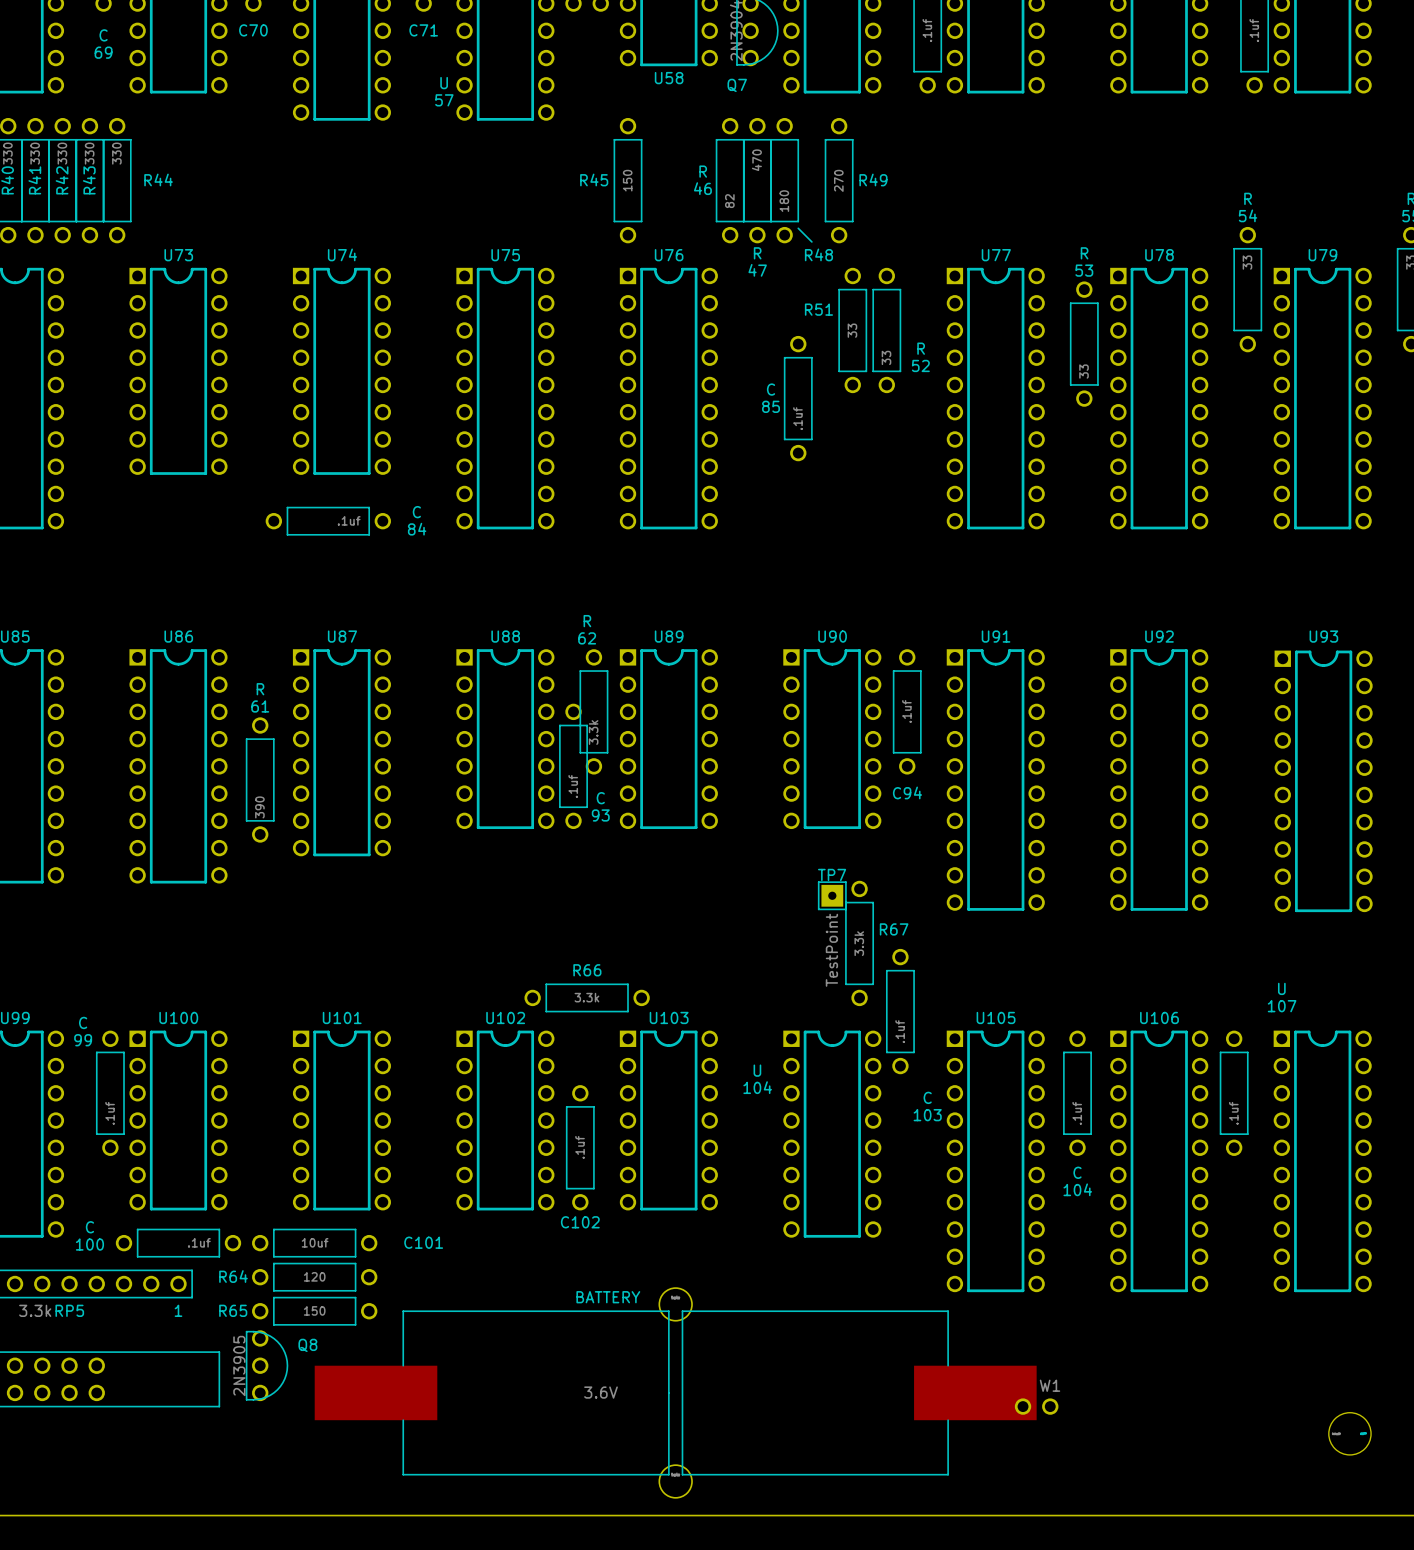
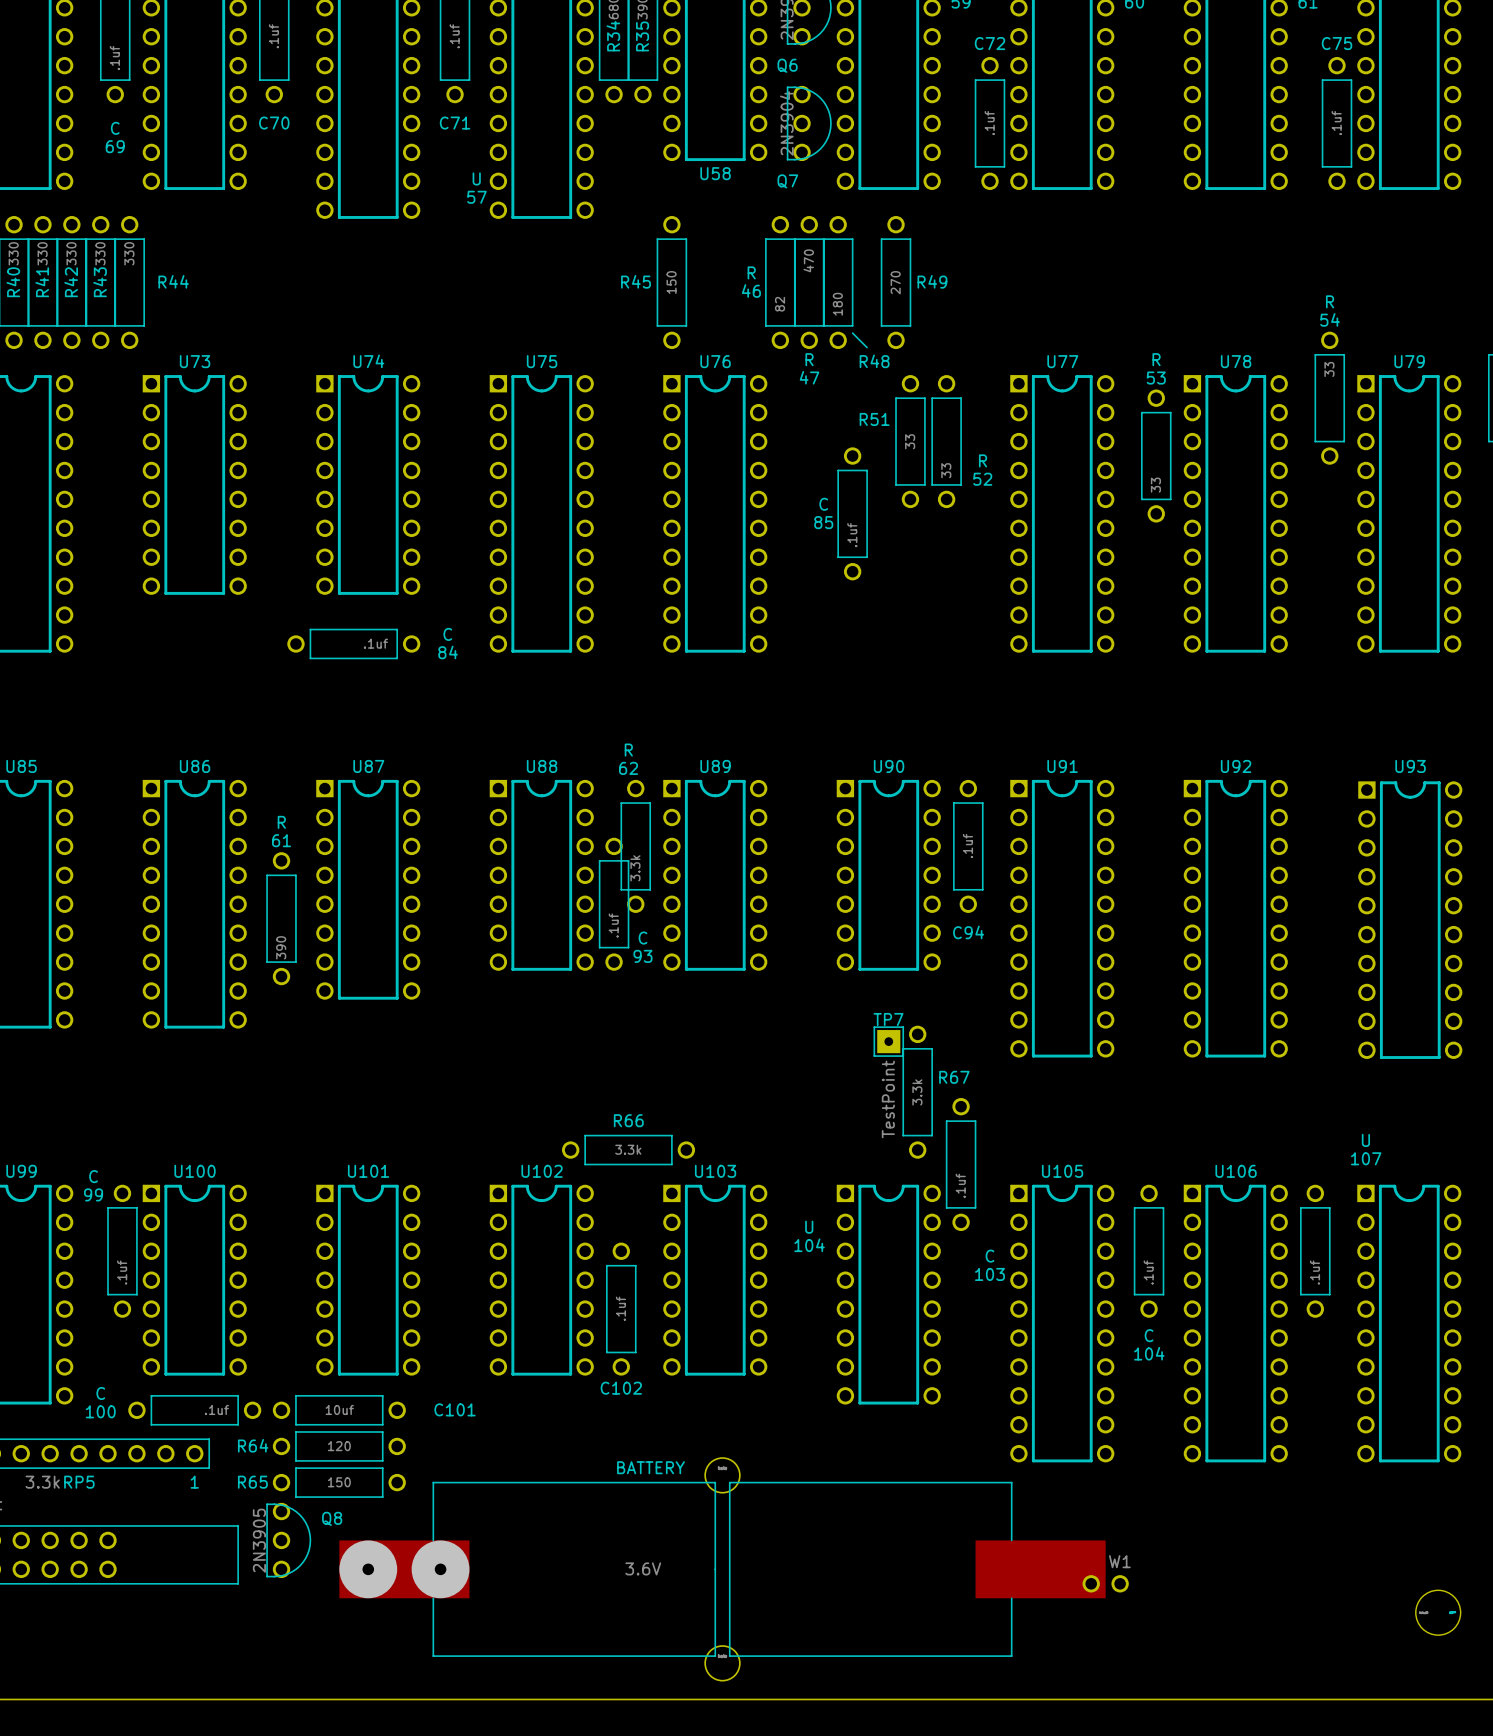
via: none -> (368, 1569)
via: none -> (440, 1569)

